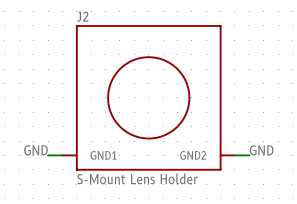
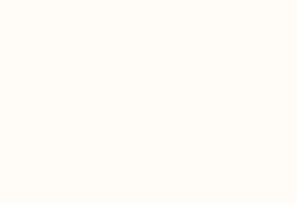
J2: (148, 97) -> none
label: GND (35, 150) -> none
label: GND (261, 150) -> none
wire: (48, 155) (62, 155) -> none
wire: (234, 155) (249, 155) -> none

